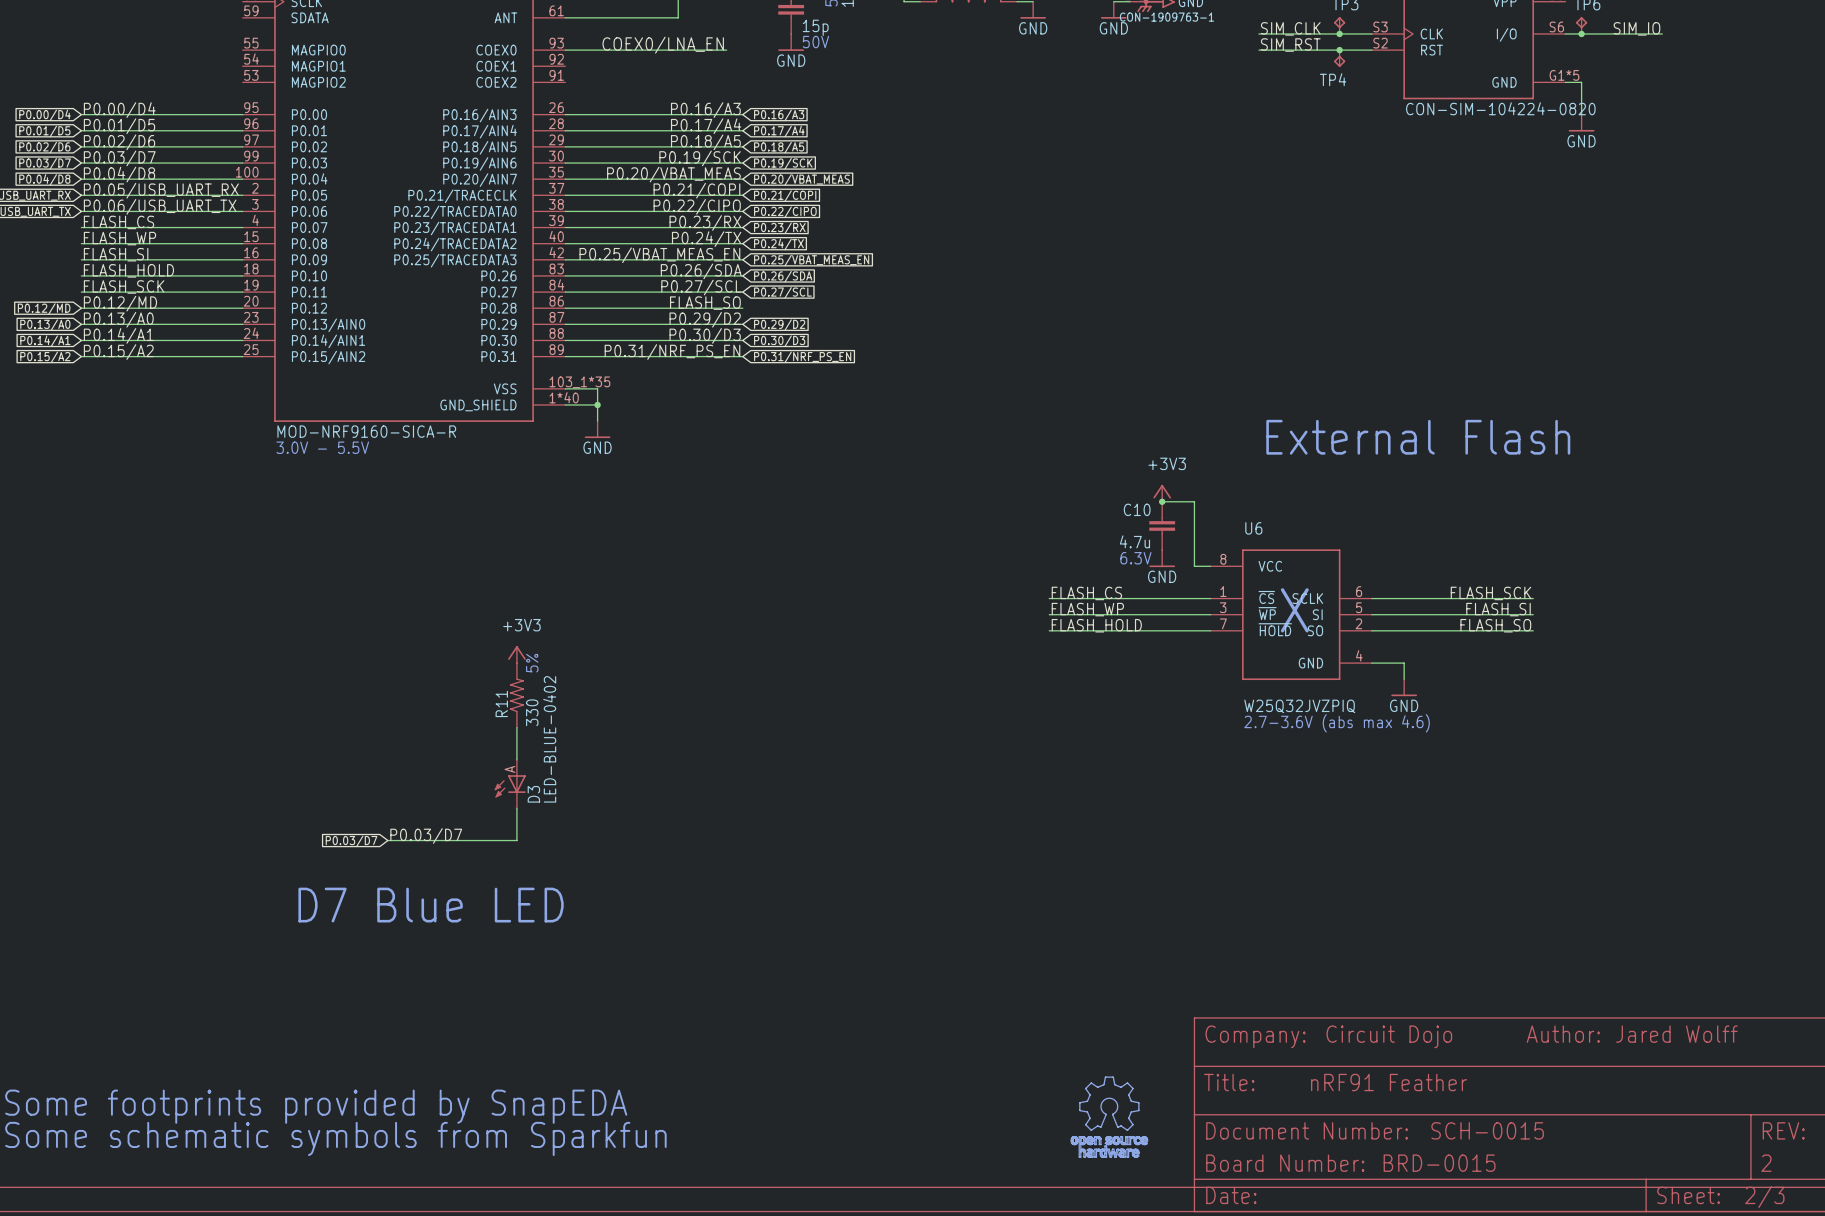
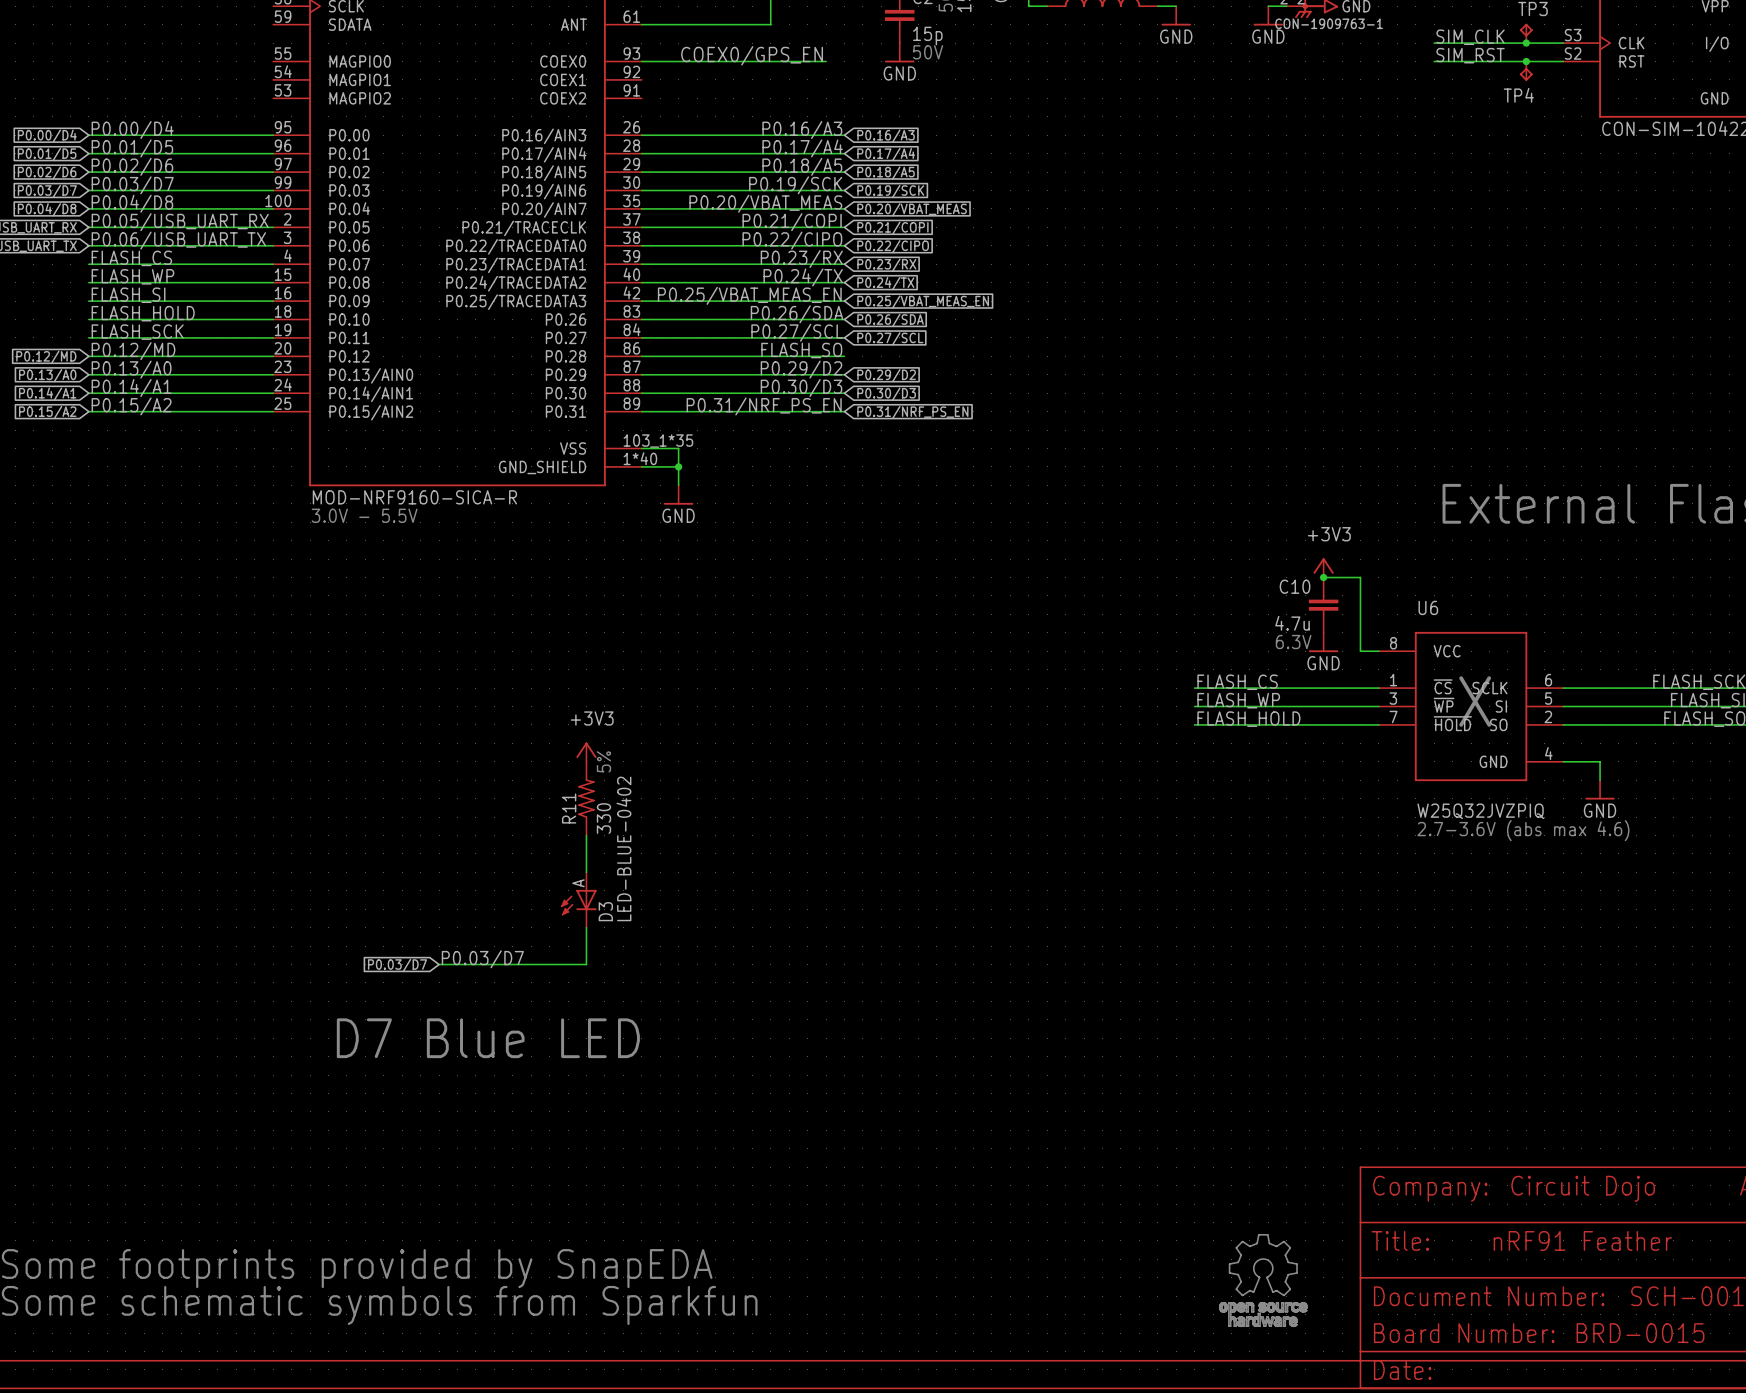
label: COEX0/LNA_EN (663, 45) -> COEX0/GPS_EN (752, 55)

